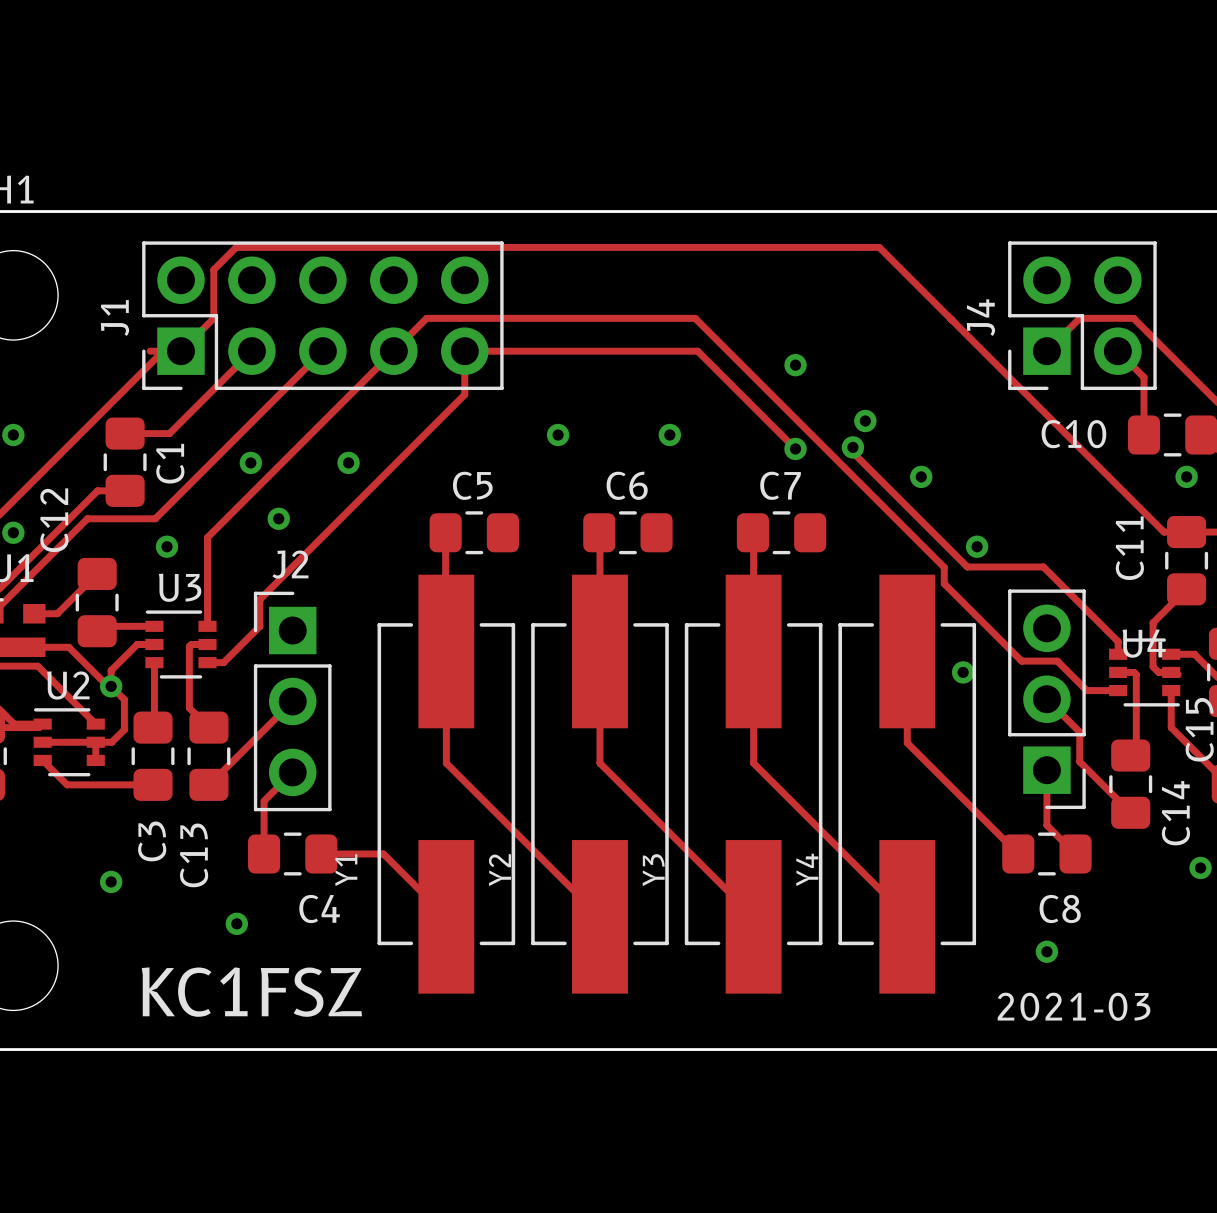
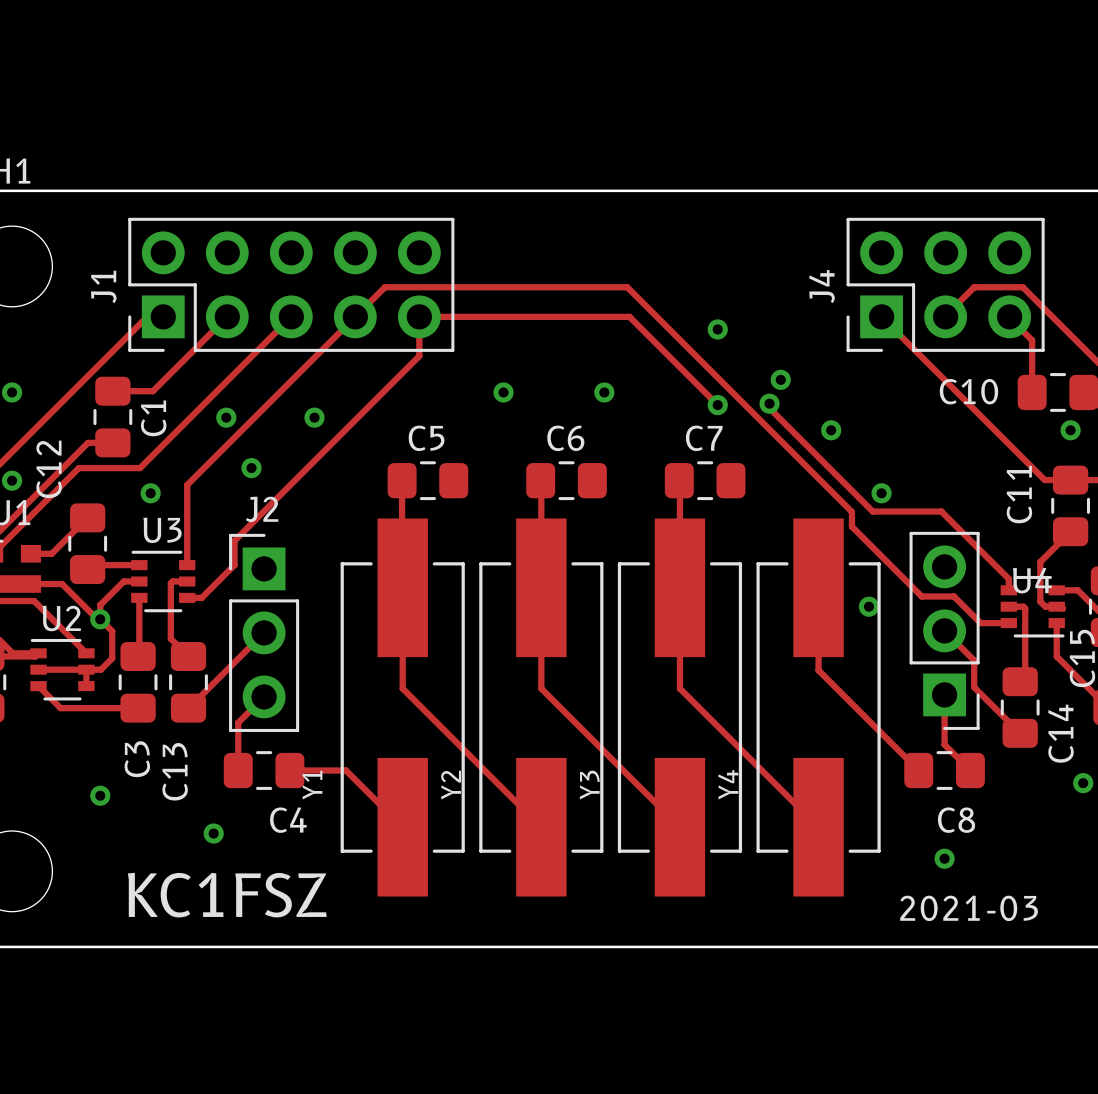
J4 footprint: [1008, 241, 1157, 391] -> [846, 217, 1045, 352]
track: (150, 351) (163, 351) -> none
track: (180, 351) (213, 318) (213, 269) (236, 247) (879, 247) (1163, 532) -> (881, 316) (1044, 480) (1050, 480)

